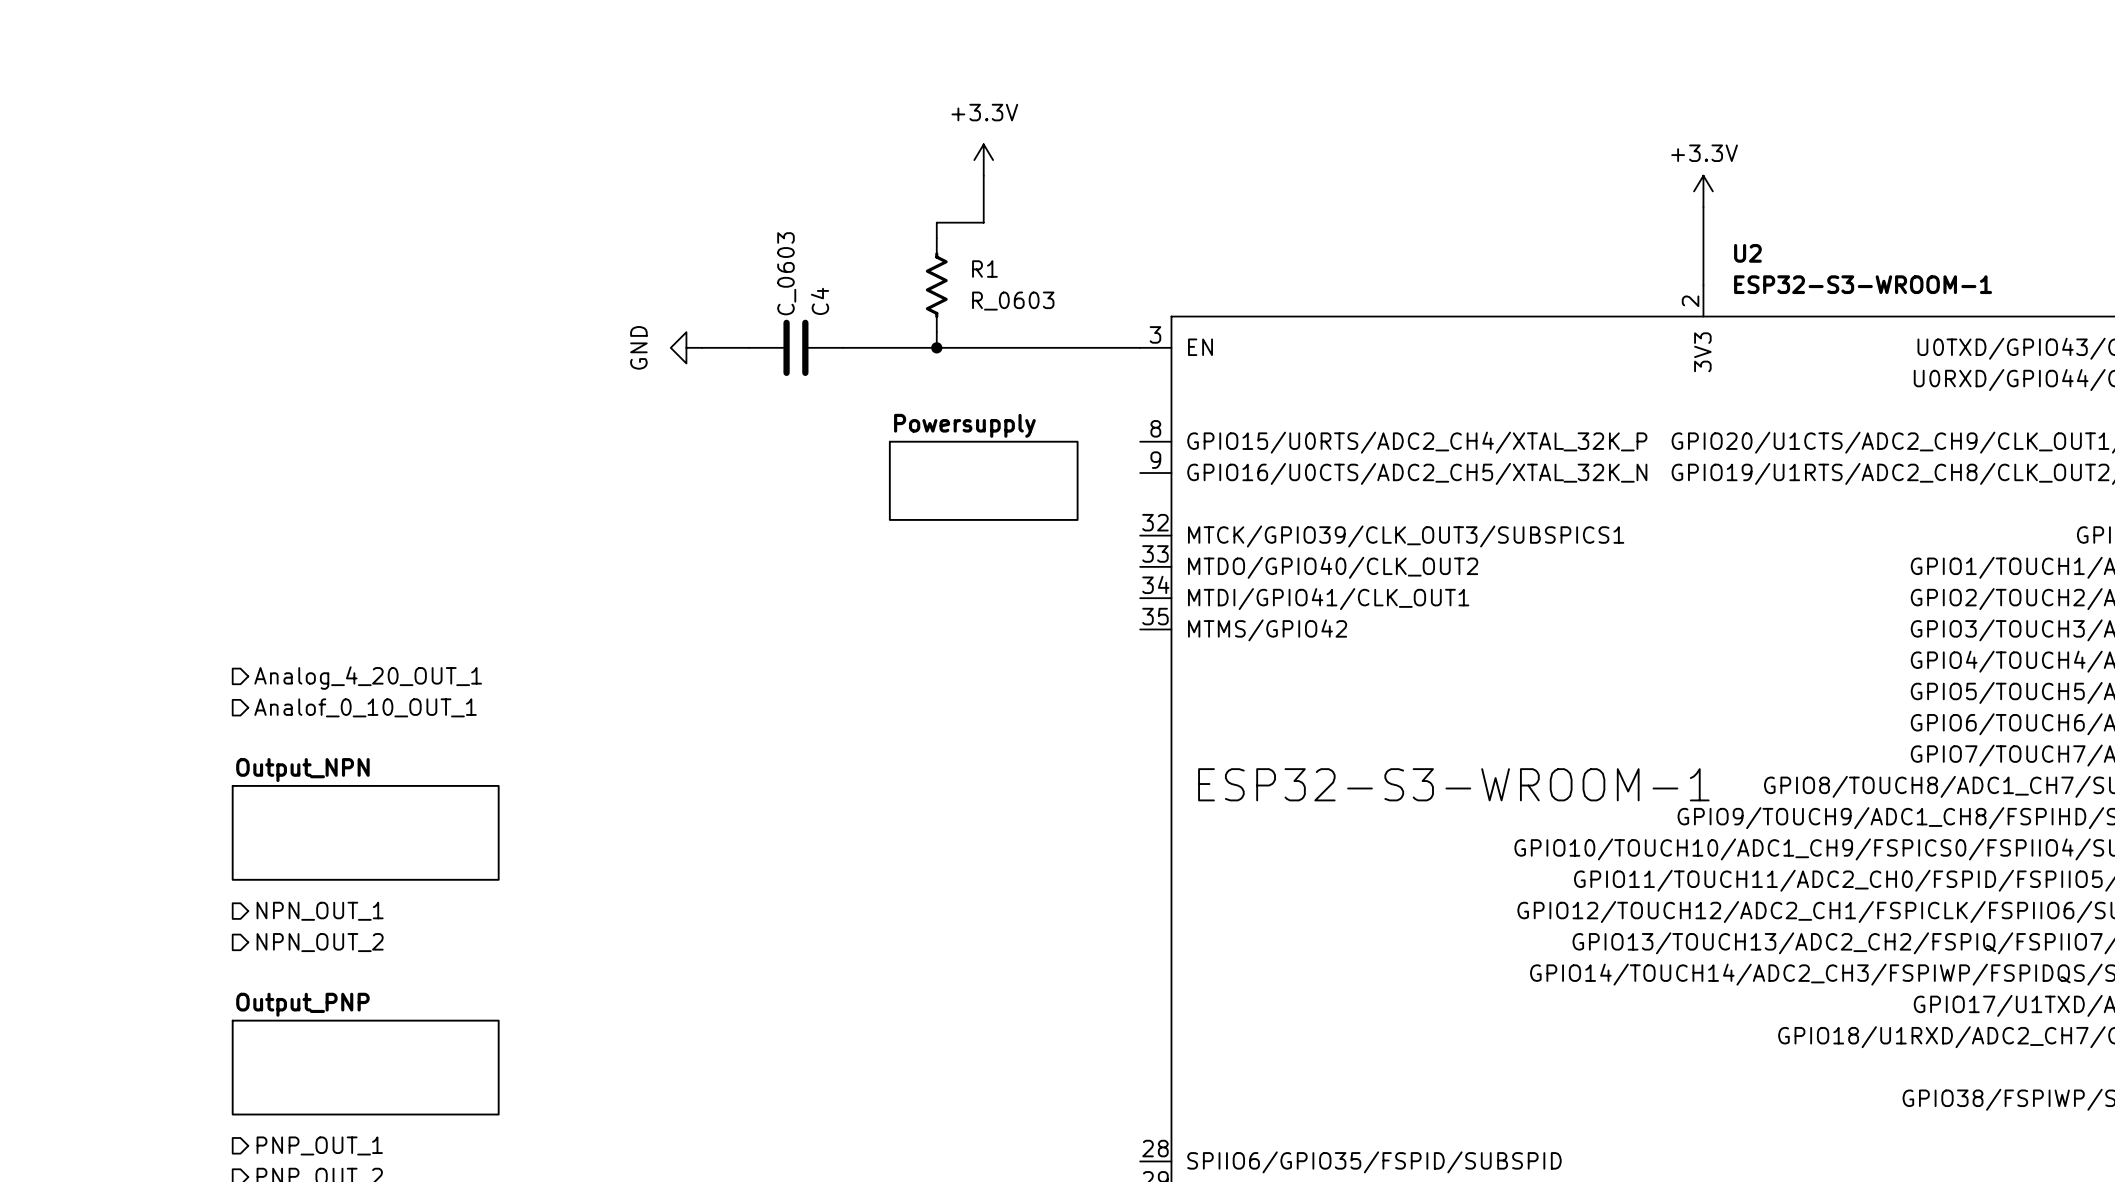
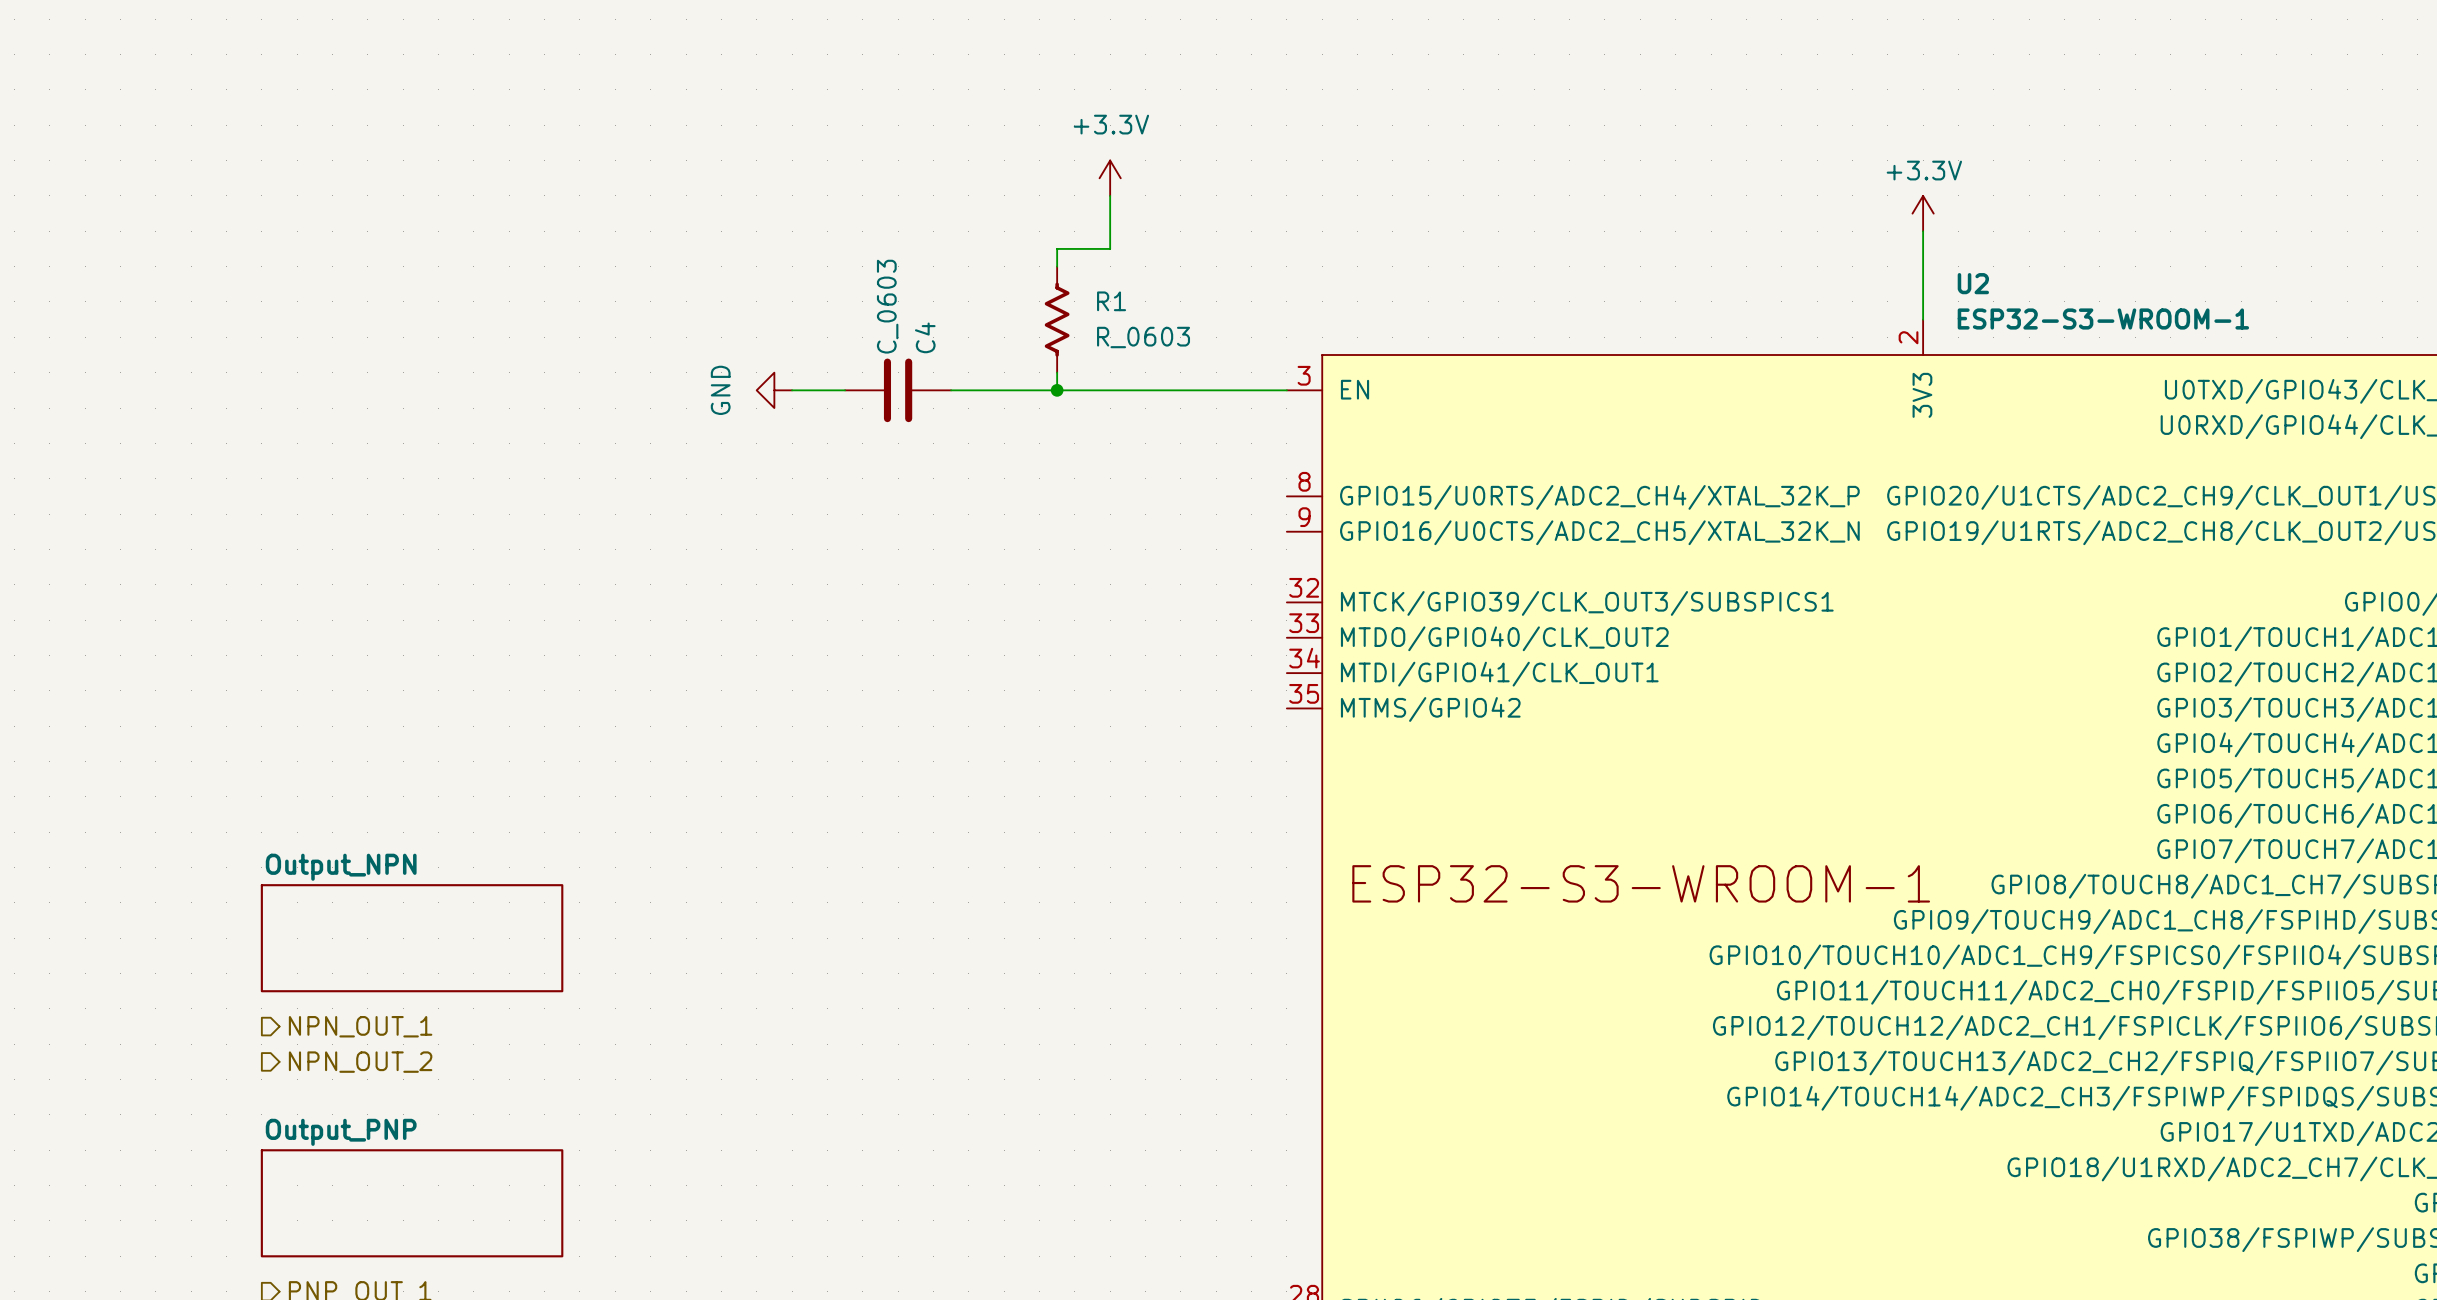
sheet Powersupply: (983, 480) -> none
hierarchical label: Analog_4_20_OUT_1 (368, 678) -> none
hierarchical label: Analof_0_10_OUT_1 (365, 707) -> none

